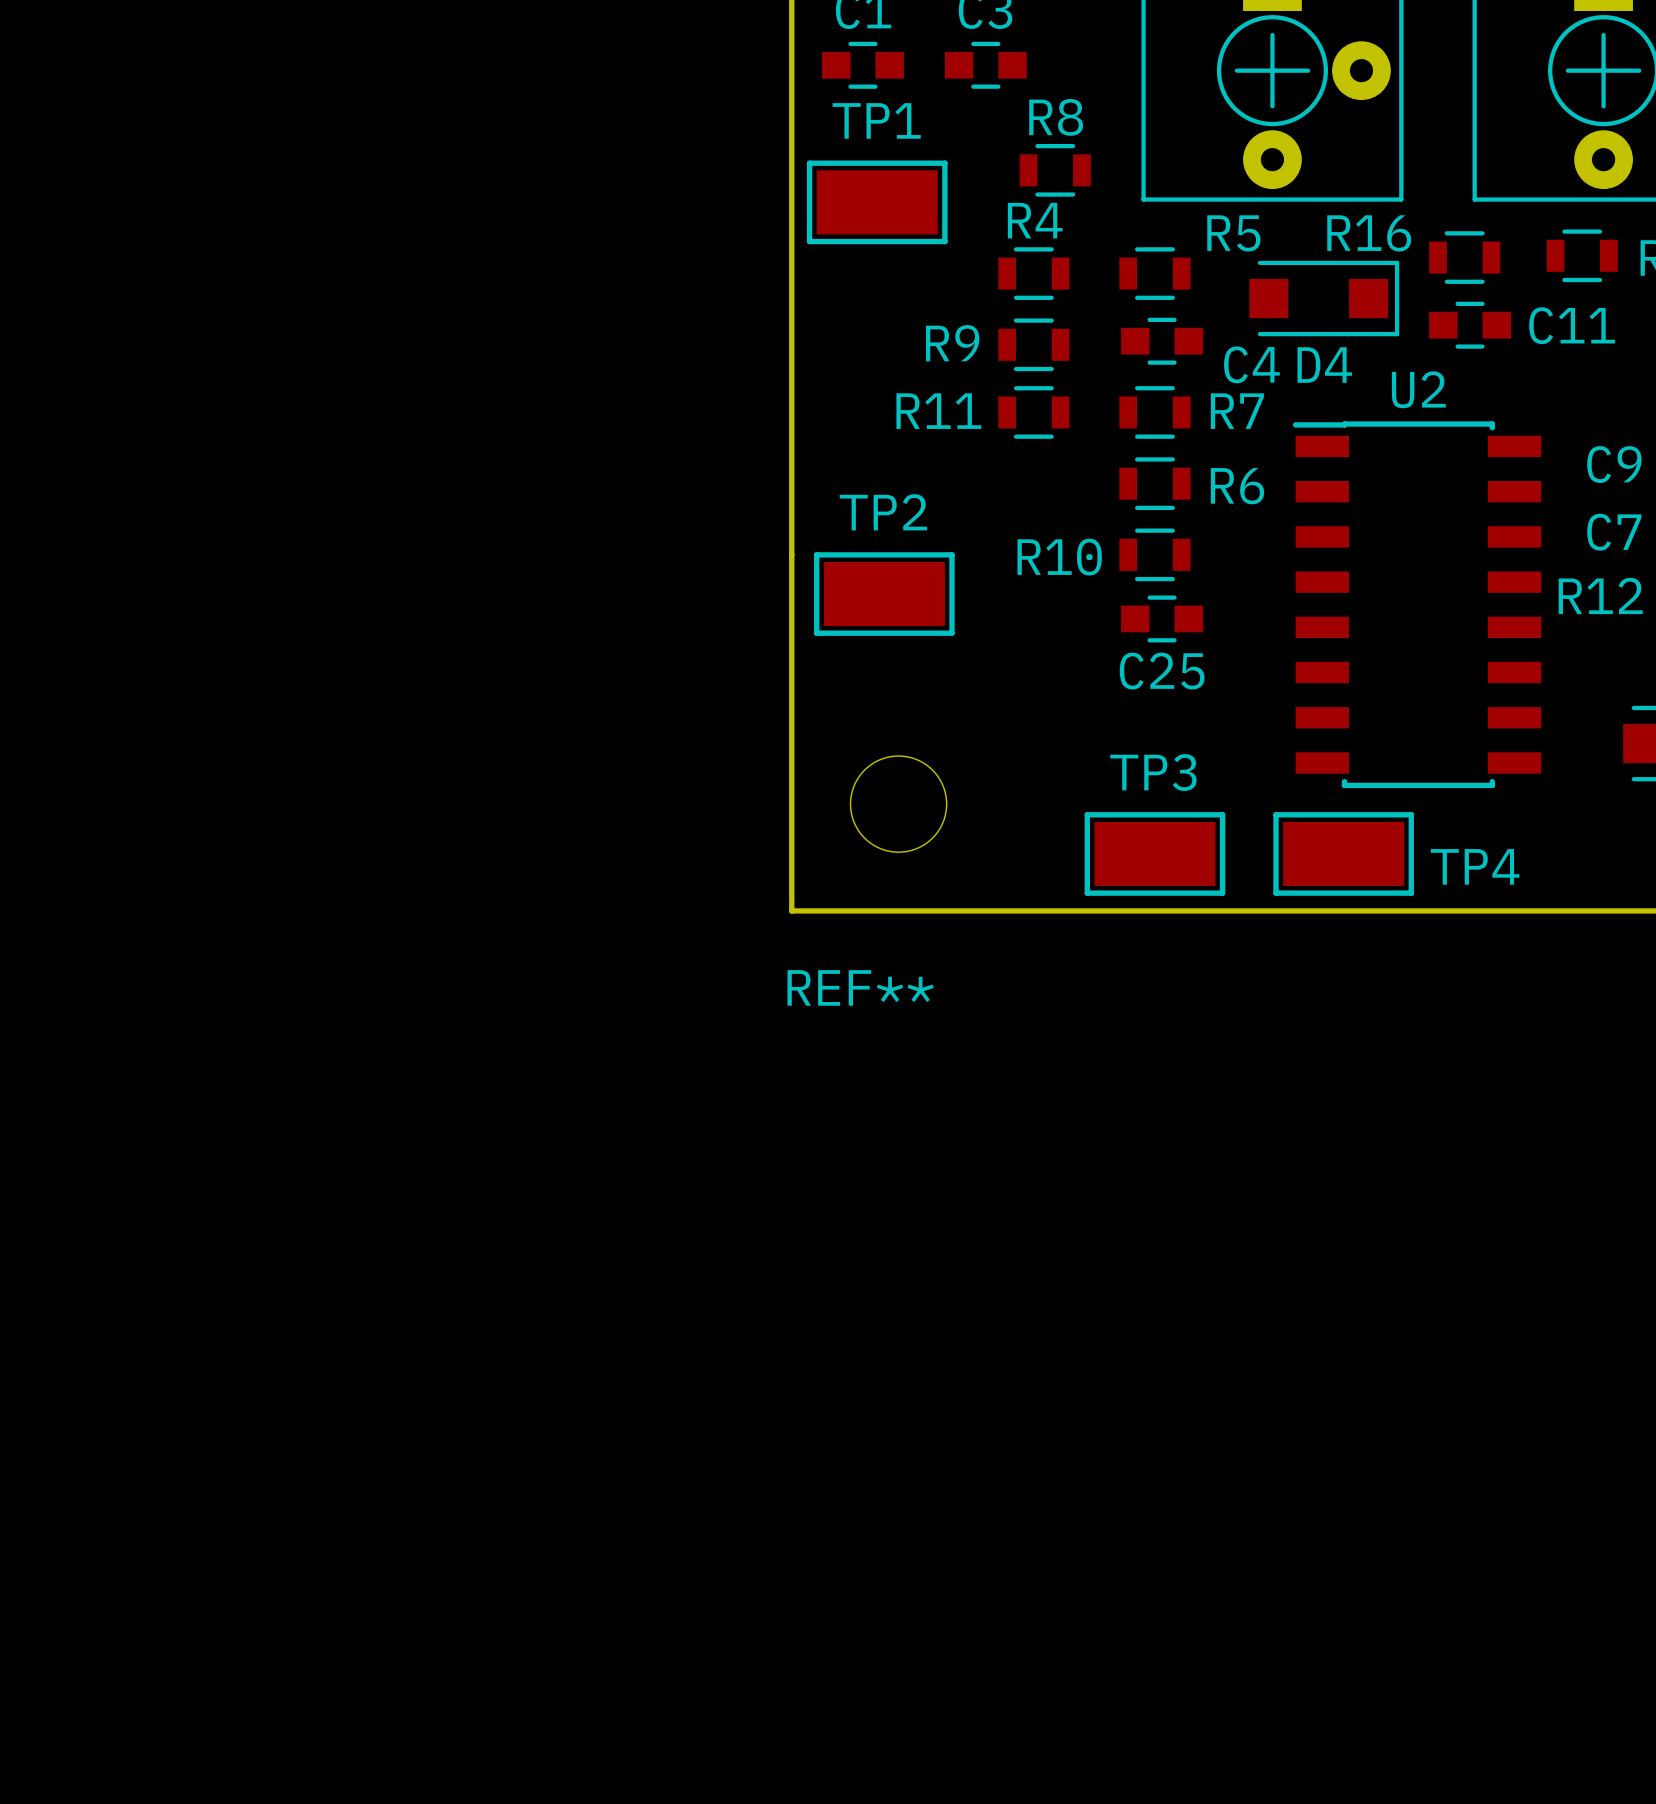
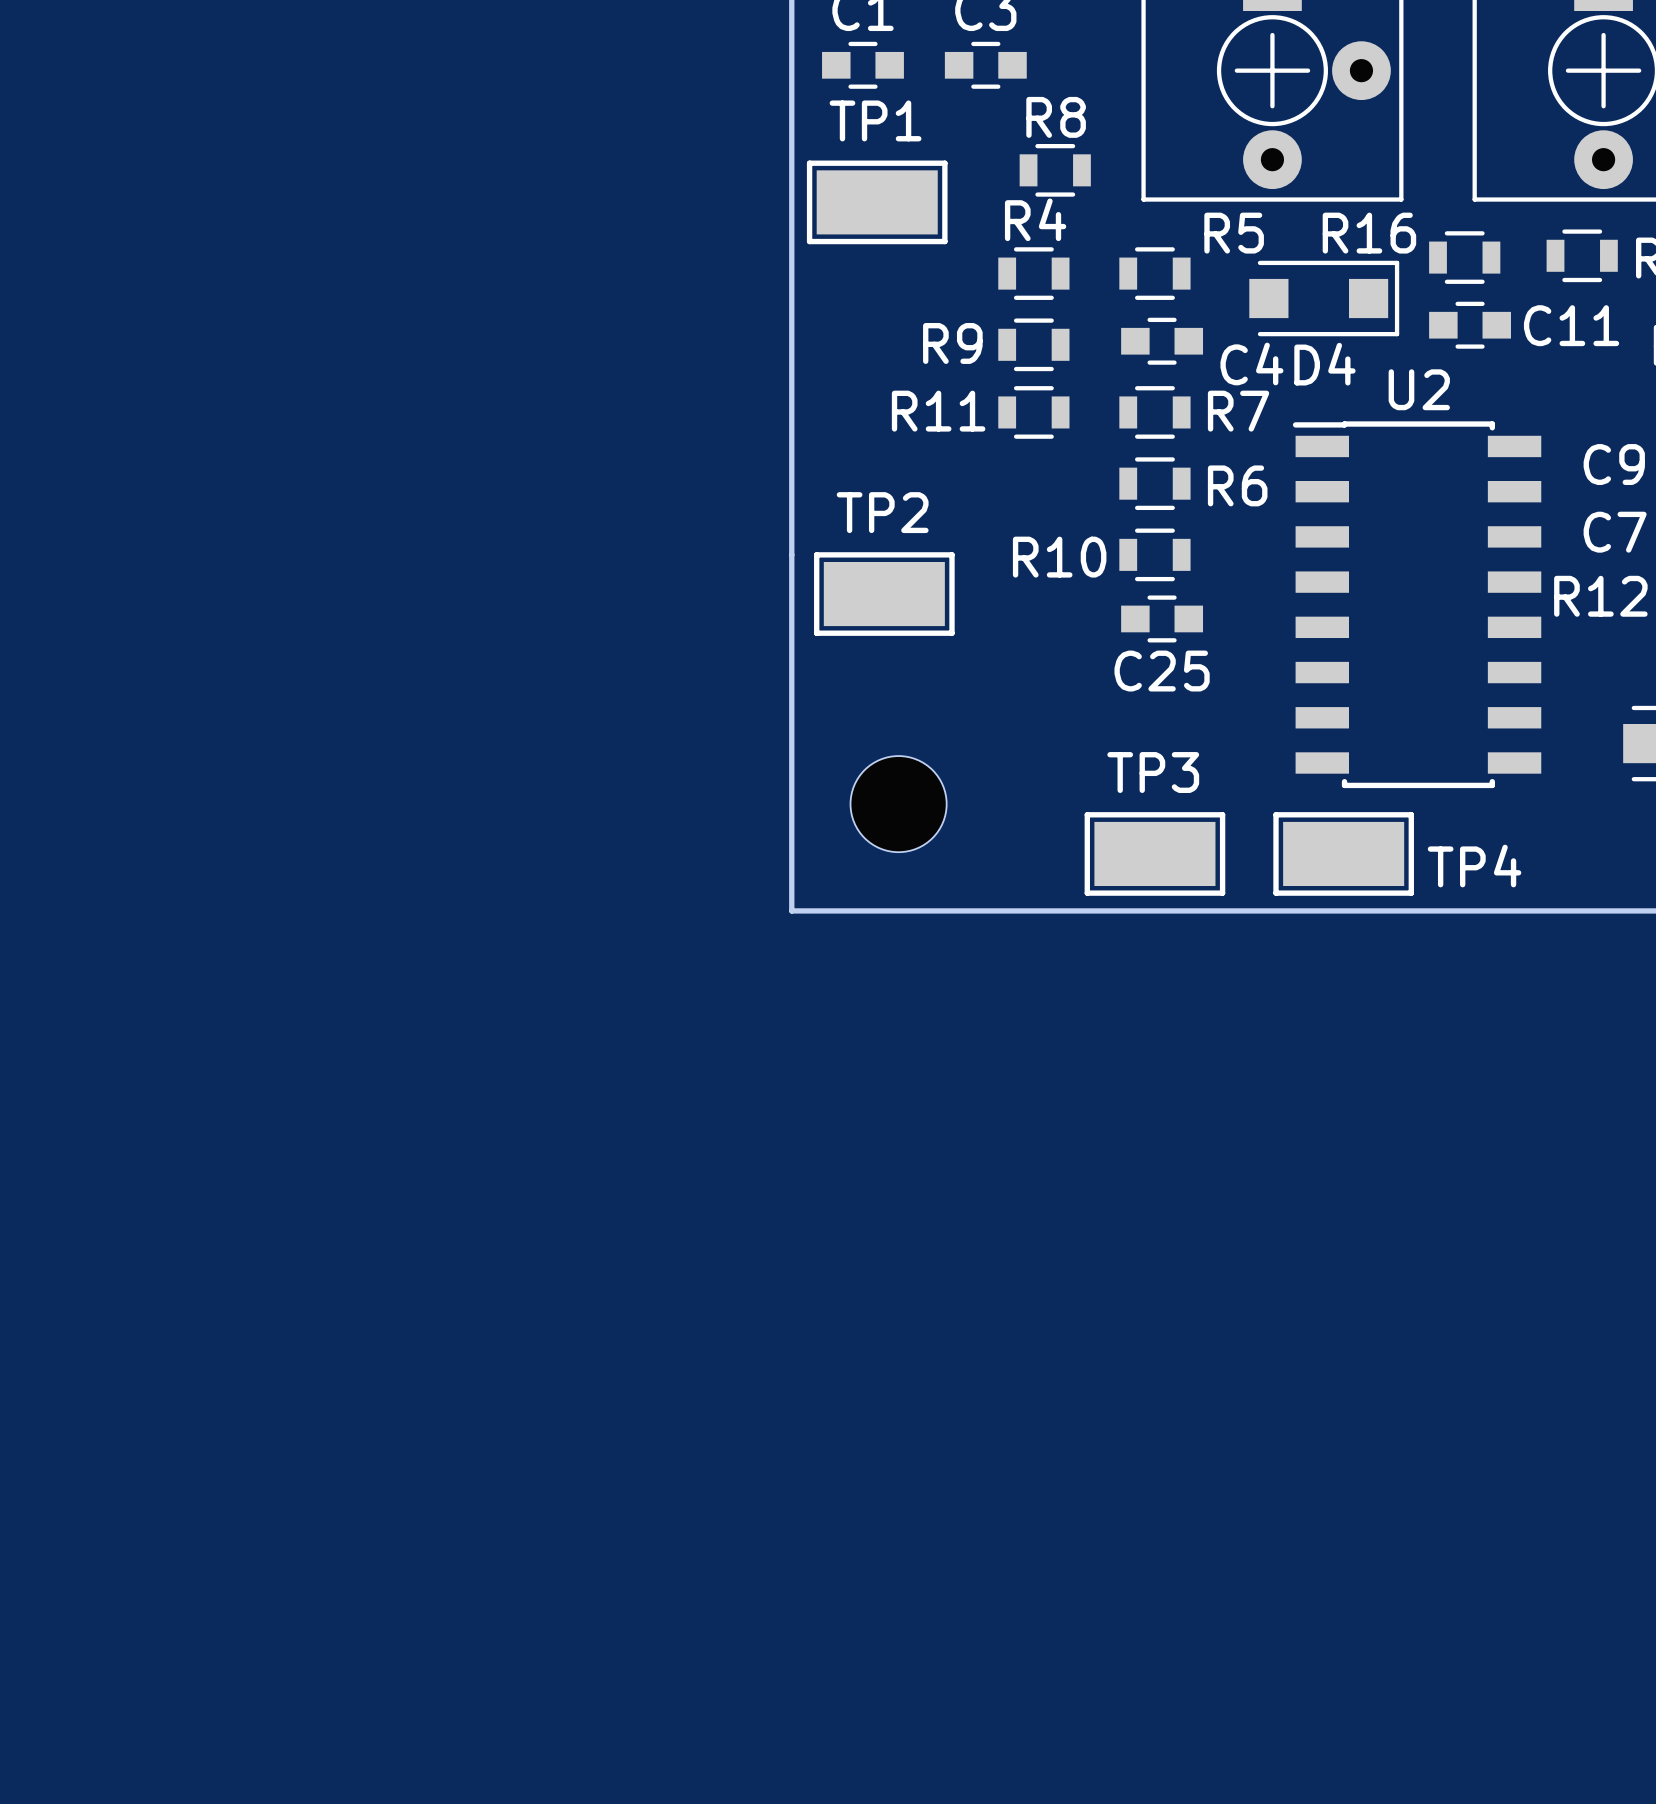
REF** name: REF** (860, 987) -> none

